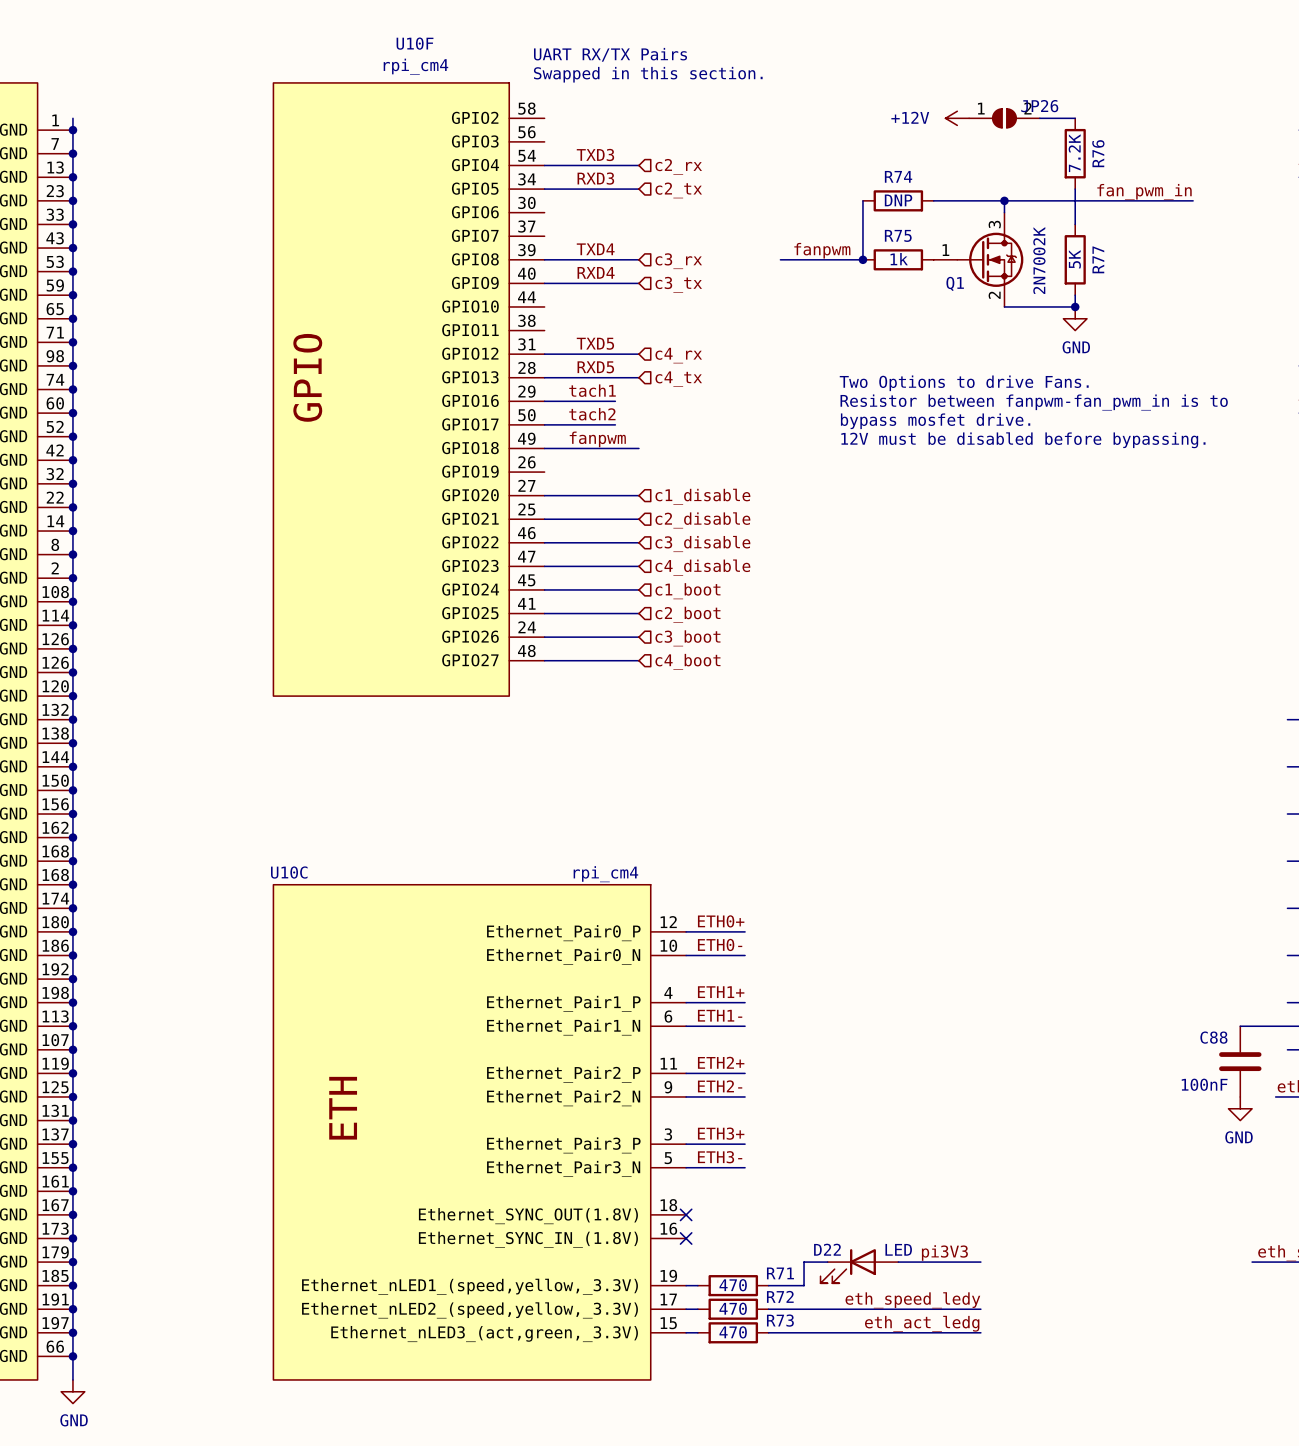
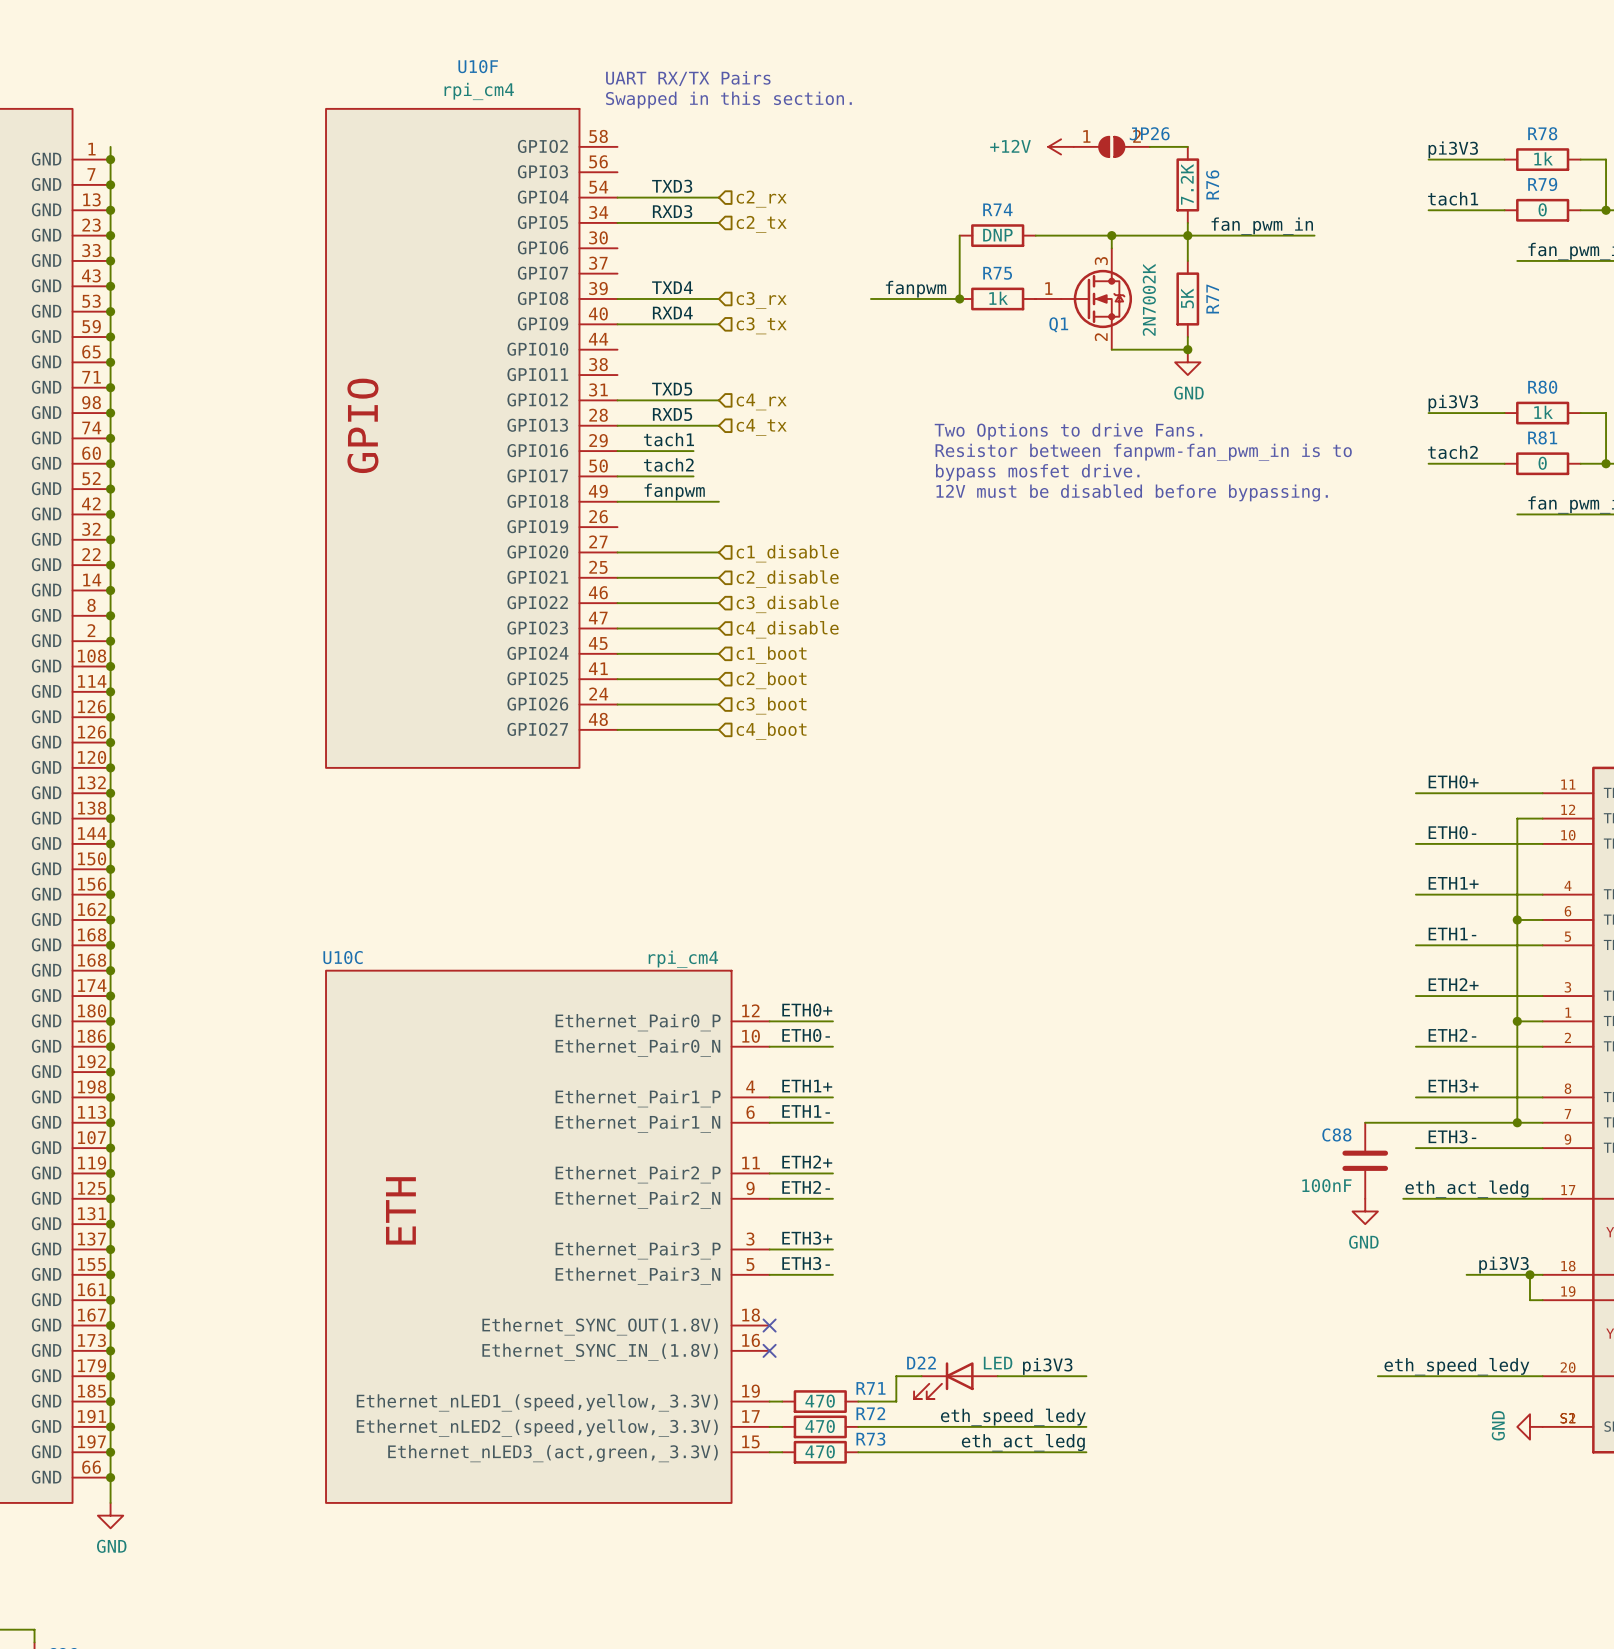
junction: none -> (1187, 235)

